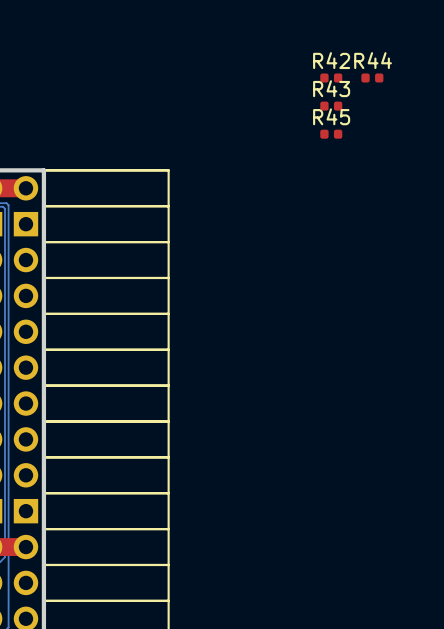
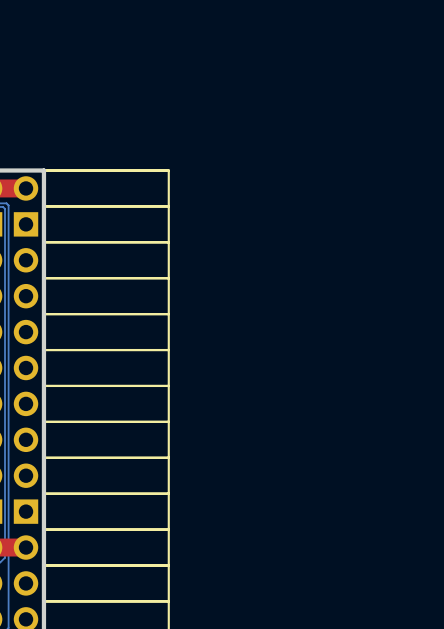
R42: (331, 77) -> none
R44: (372, 77) -> none
R43: (331, 106) -> none
R45: (331, 134) -> none

